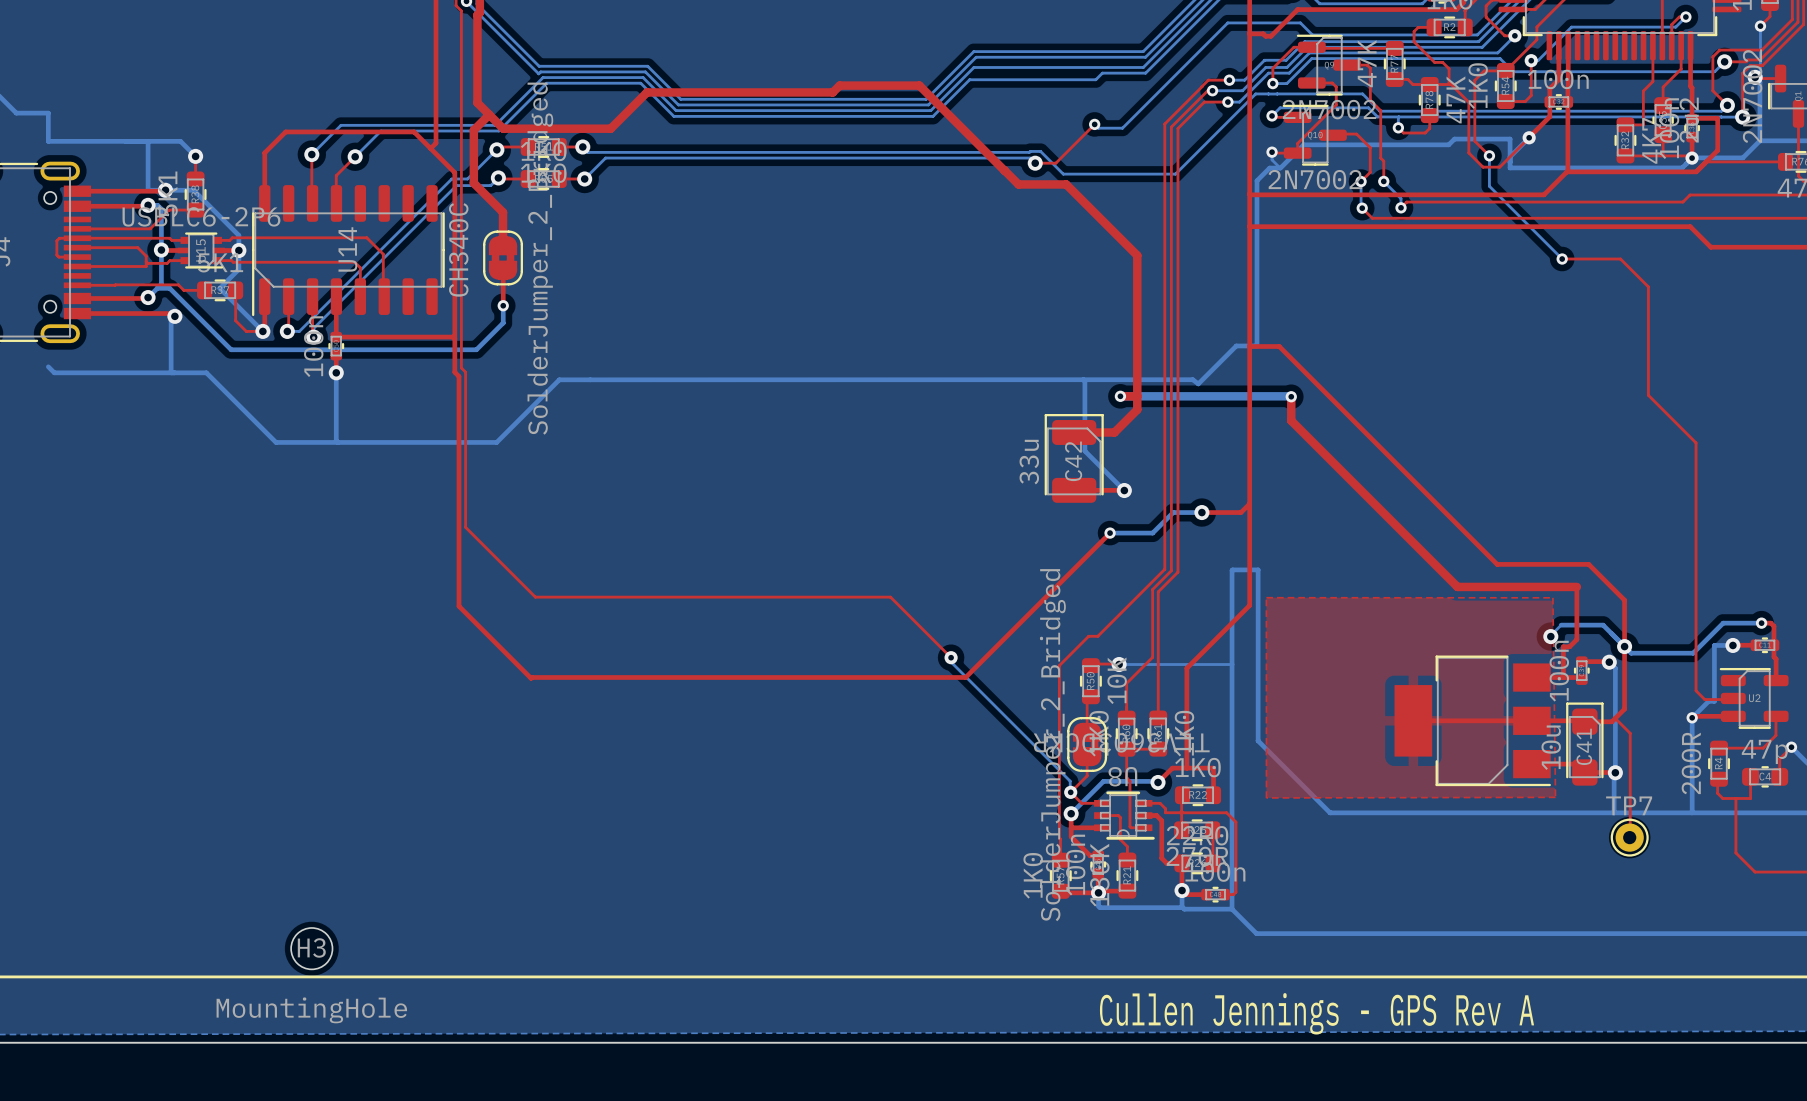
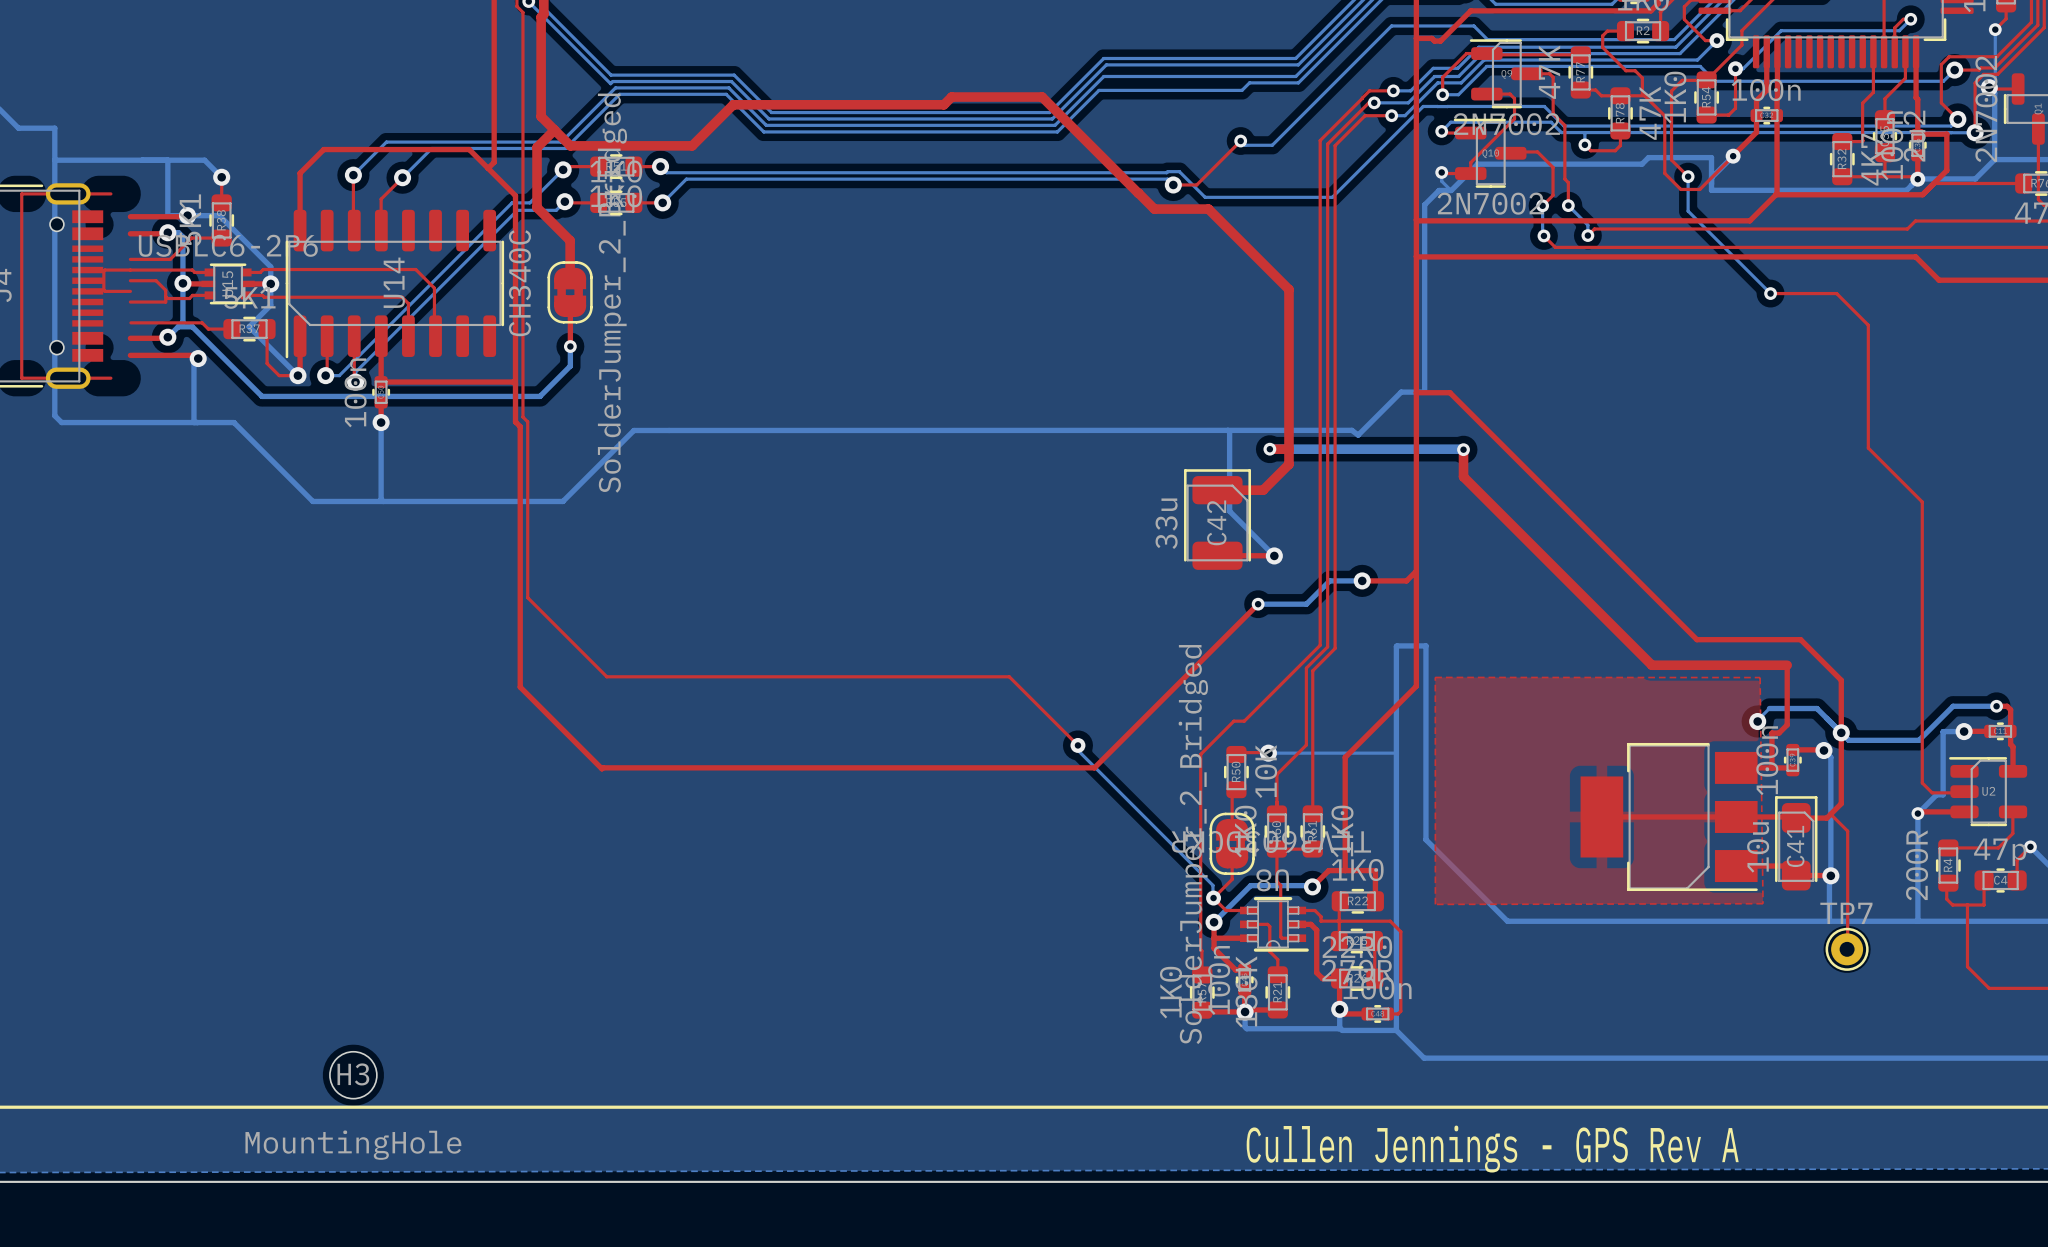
bottom track: none -> (54, 160) (54, 415)
top track: none -> (110, 193) (21, 193) (21, 378) (110, 378)
top track: (77, 191) (115, 191) -> none
top track: (77, 206) (115, 206) -> none
top track: (77, 228) (115, 228) -> none
top track: (92, 238) (59, 238) (56, 240) (56, 255) (58, 257) (77, 257) -> (104, 270) (104, 291) (130, 291)
top track: (77, 247) (115, 247) -> none
top track: (77, 266) (115, 266) -> none
top track: (115, 284) (77, 285) -> none
top track: (77, 298) (115, 298) -> none
top track: (77, 313) (115, 313) -> none

